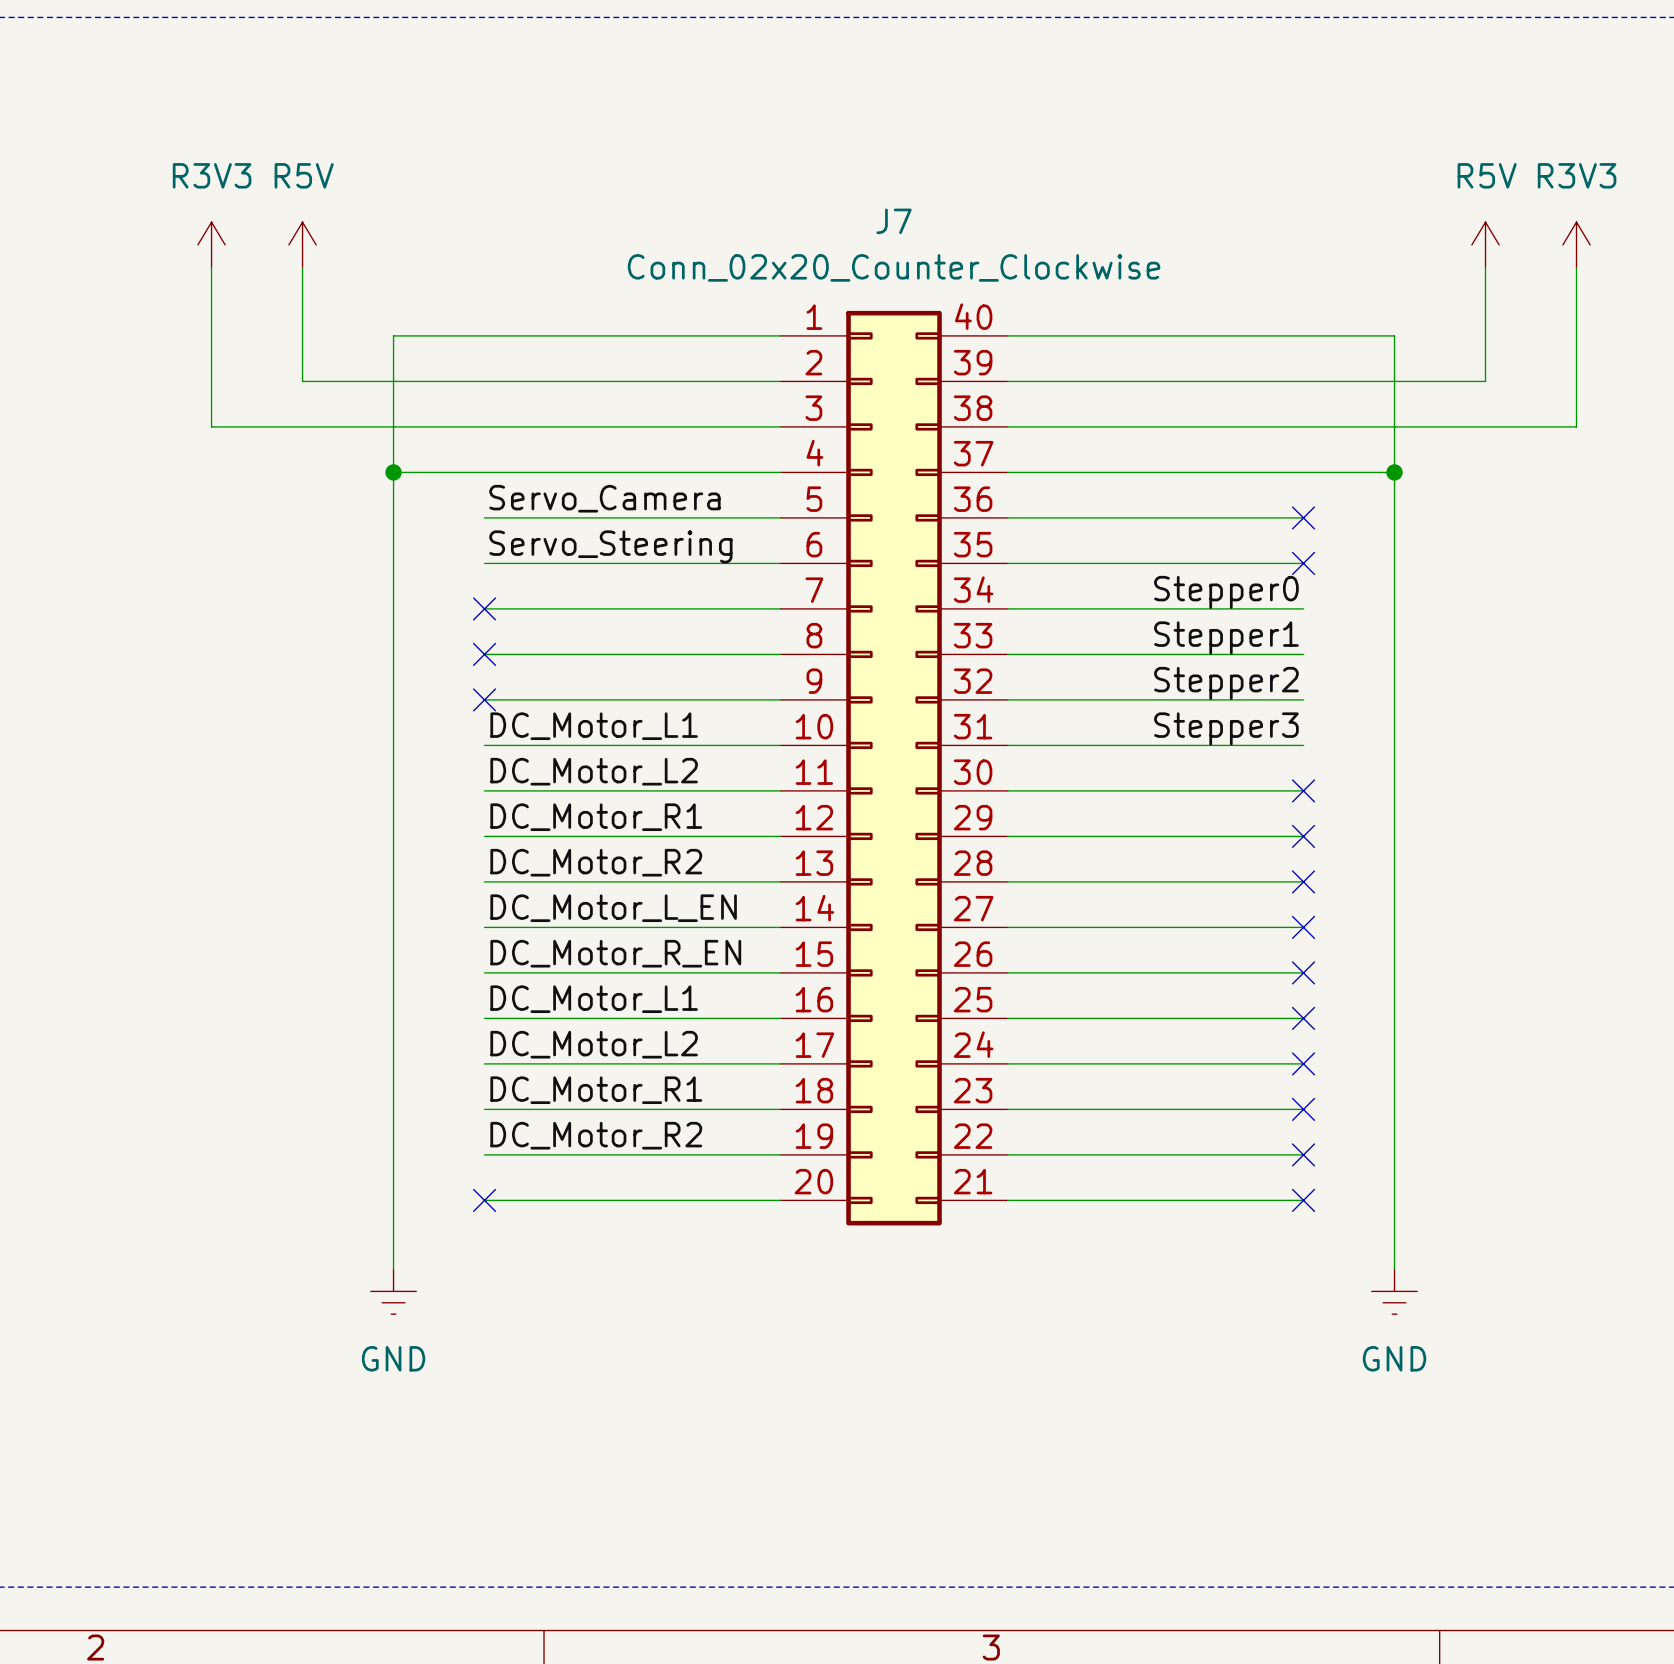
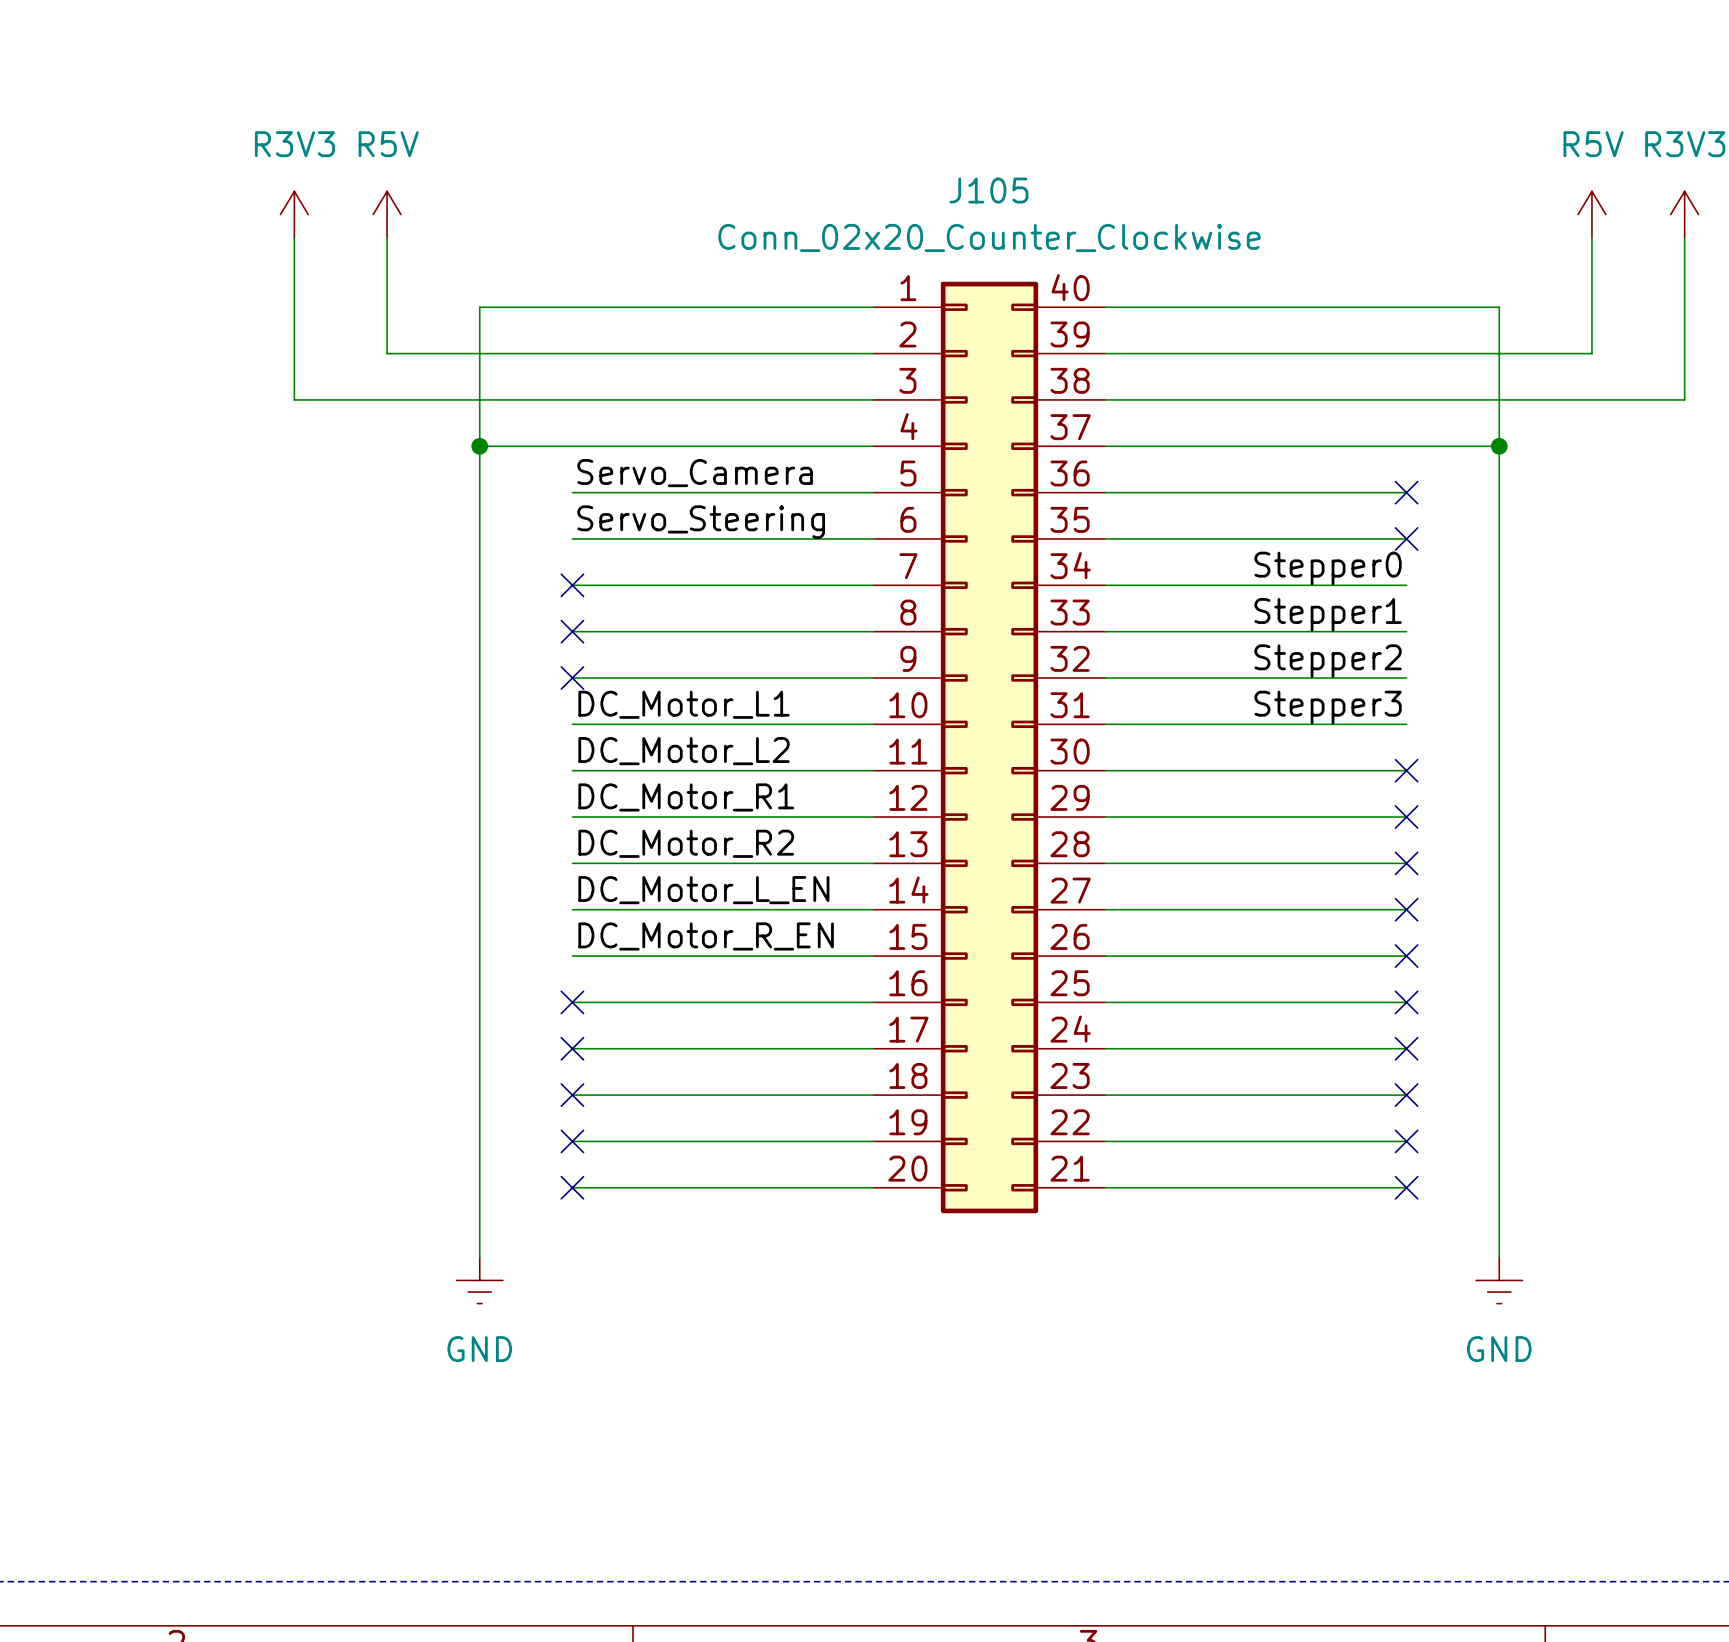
J7 name: J7 (894, 221) -> J105 (988, 190)
label: DC_Motor_L1 (594, 999) -> none
no-connect mark: none -> (572, 1002)
label: DC_Motor_L2 (594, 1044) -> none
no-connect mark: none -> (572, 1048)
label: DC_Motor_R1 (596, 1090) -> none
no-connect mark: none -> (572, 1095)
label: DC_Motor_R2 (596, 1135) -> none
no-connect mark: none -> (572, 1141)

